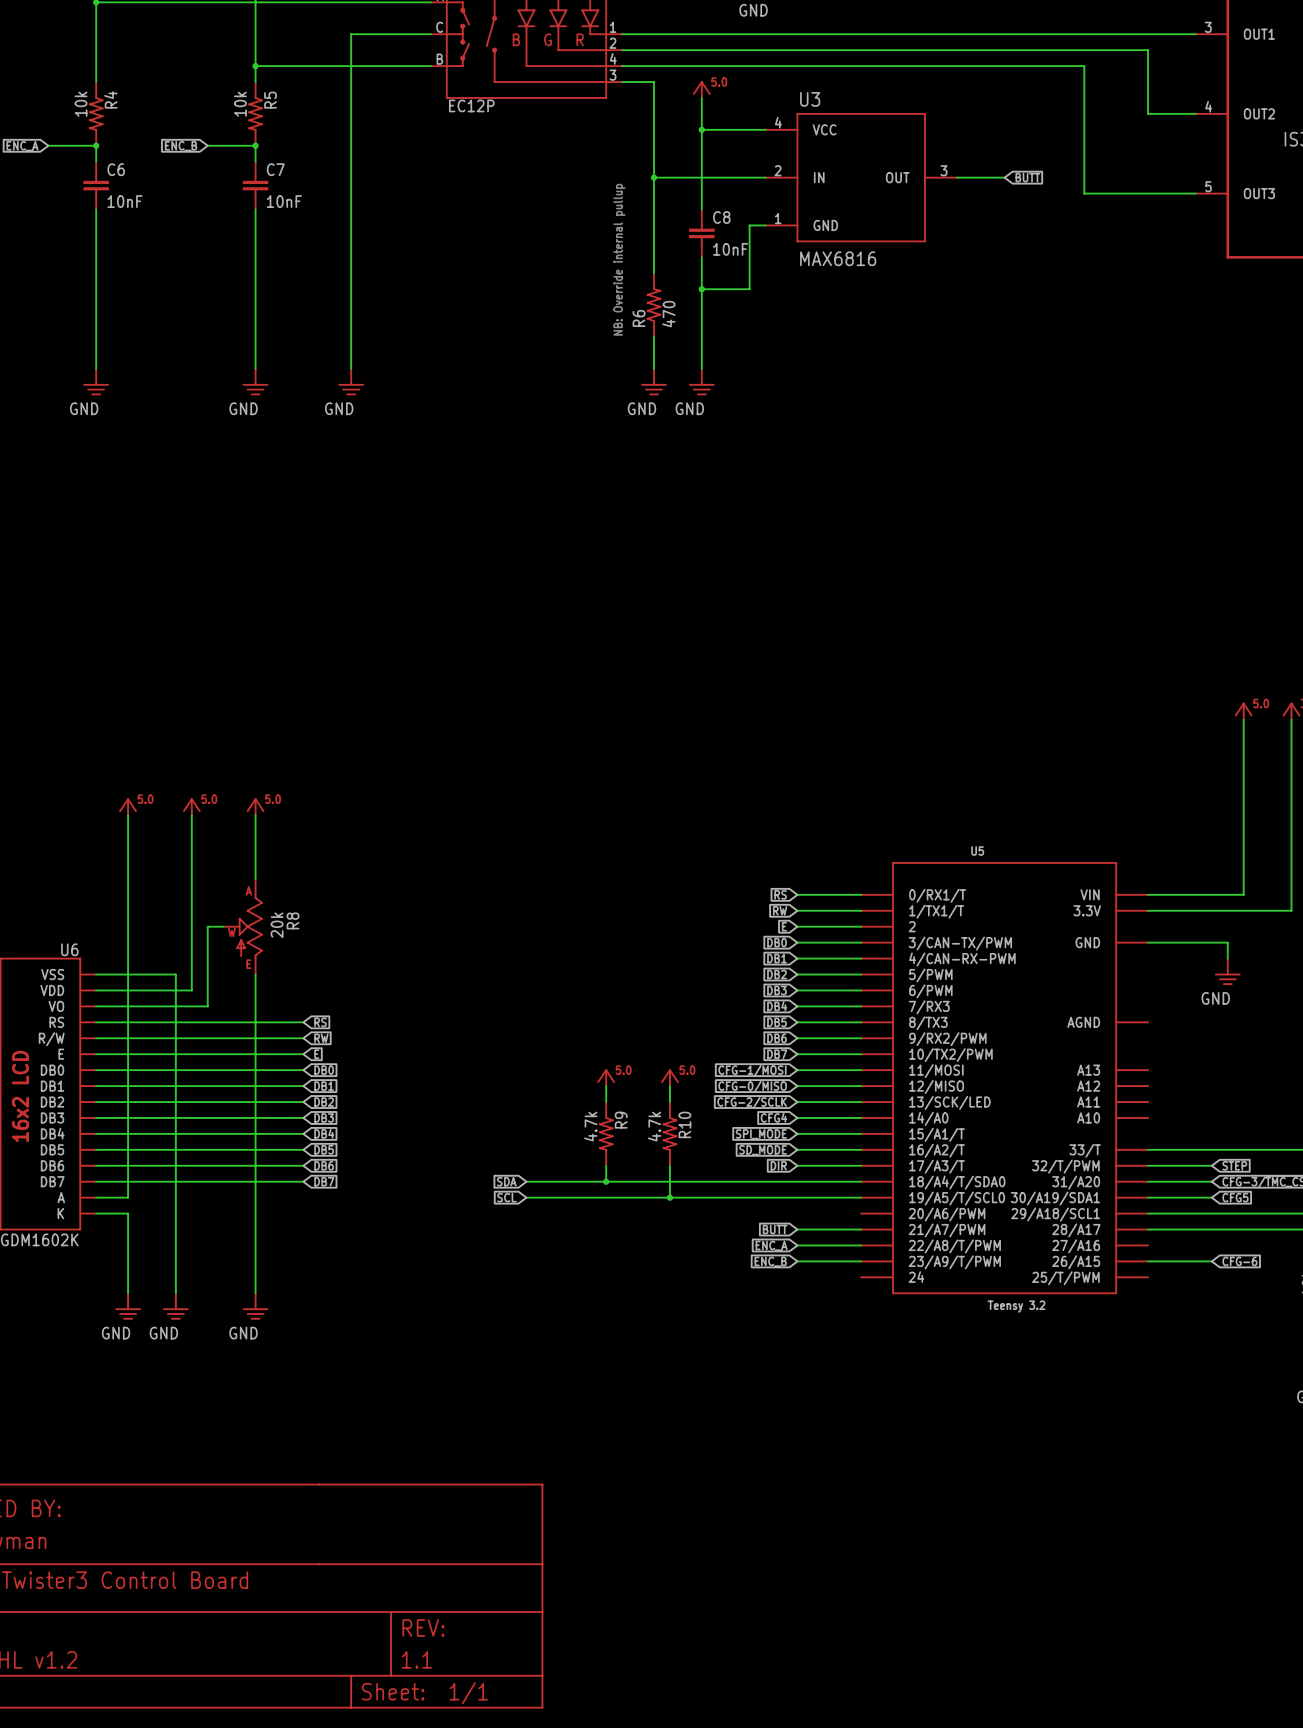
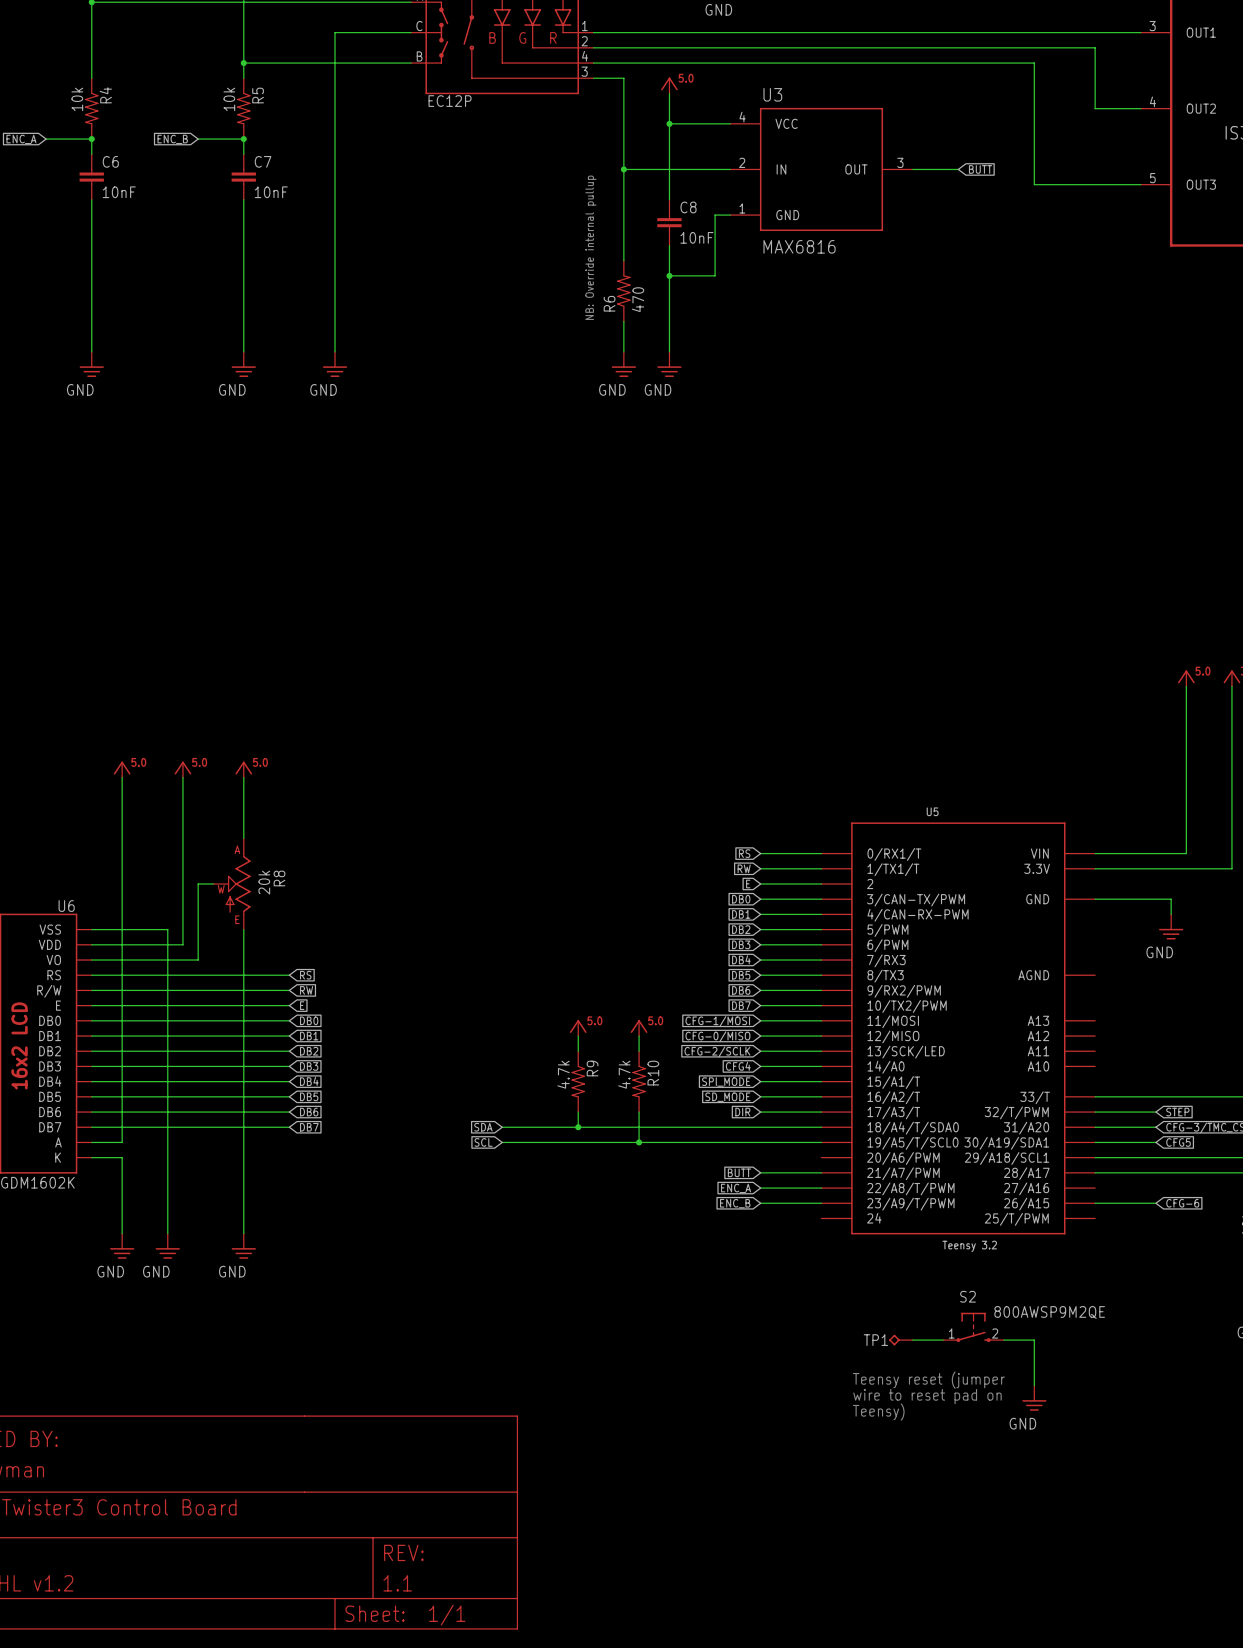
S2: none -> 800AWSP9M2QE (973, 1327)
TP1: none -> (900, 1340)
wire: none -> (912, 1340) (943, 1340)
wire: none -> (1003, 1340) (1034, 1340) (1034, 1385)
text: none -> Teensy reset (jumper (928, 1380)
text: none -> wire to reset pad on (927, 1396)
power symbol: none -> GND (1034, 1398)
text: none -> Teensy) (878, 1412)

